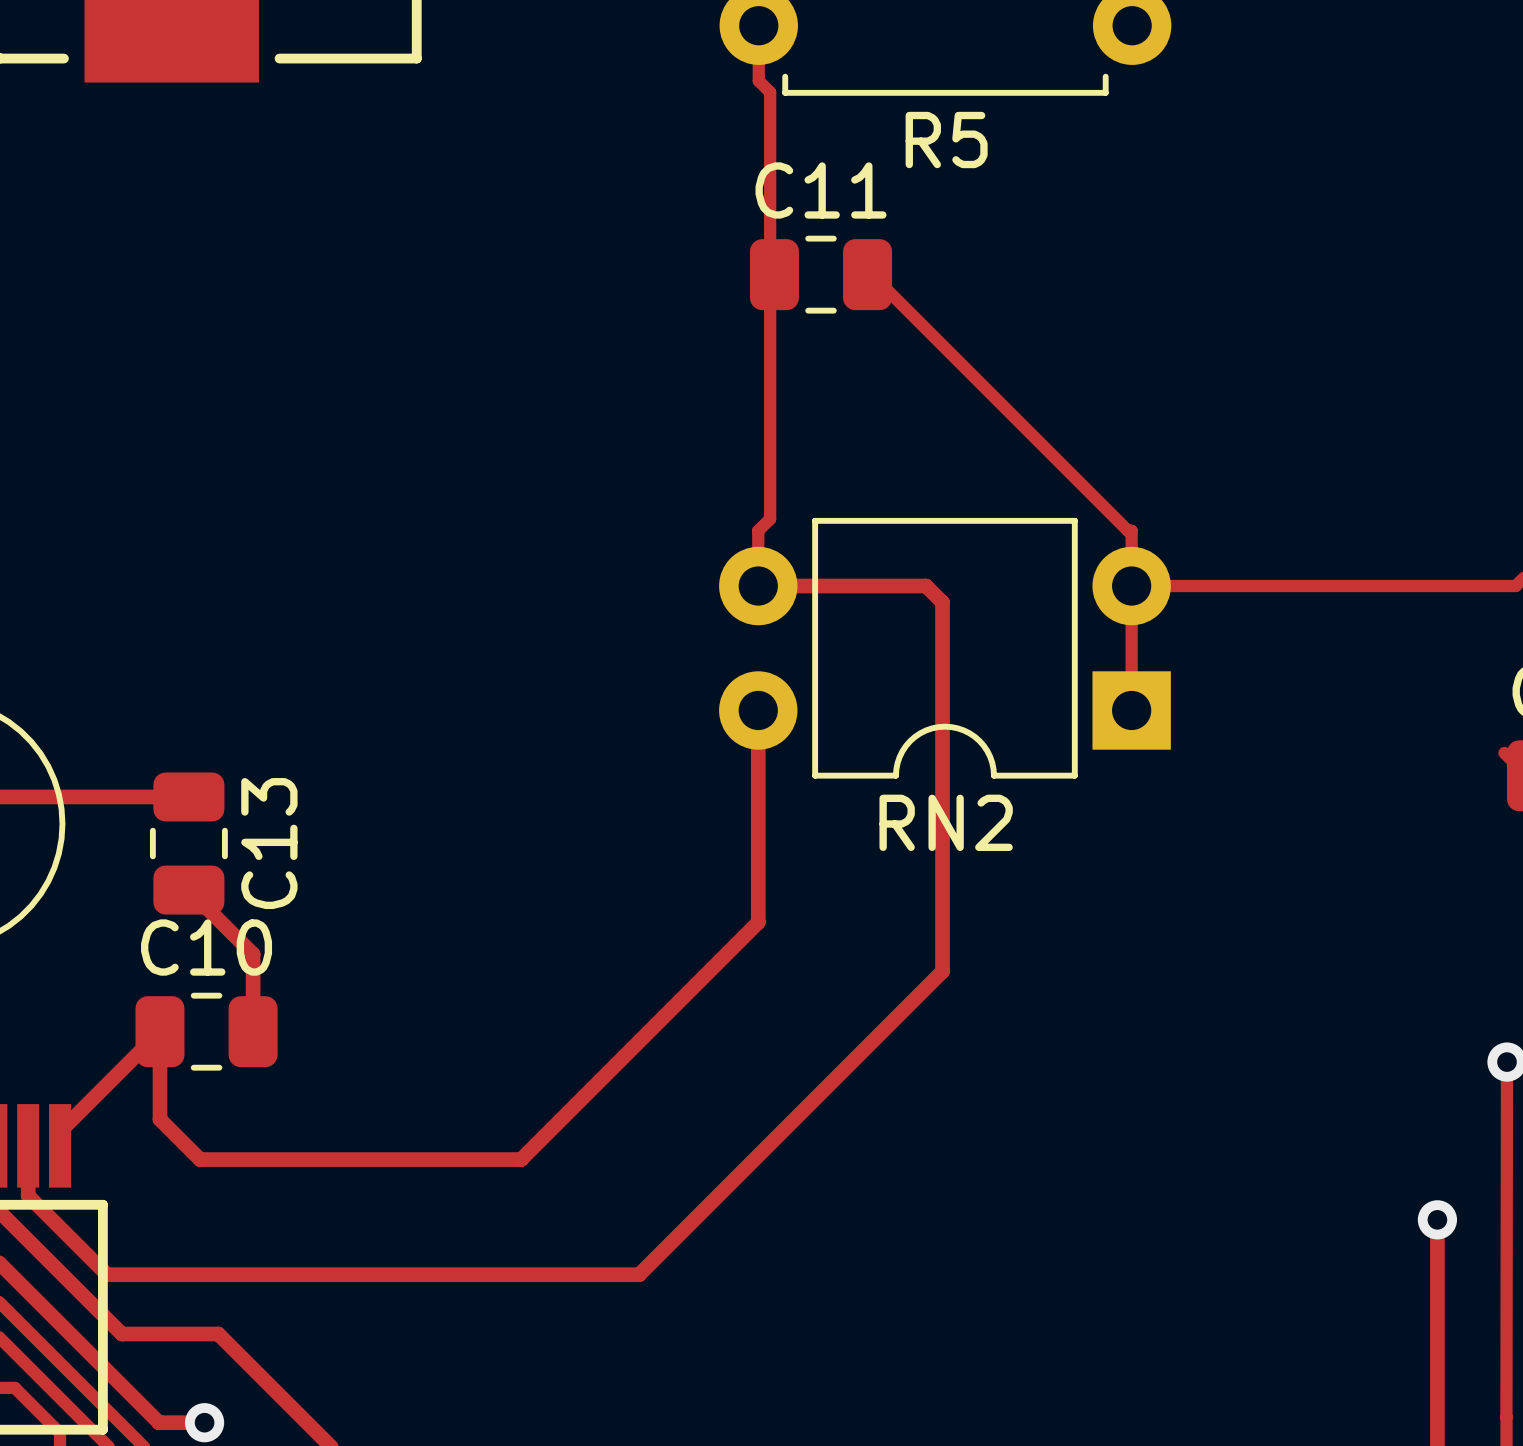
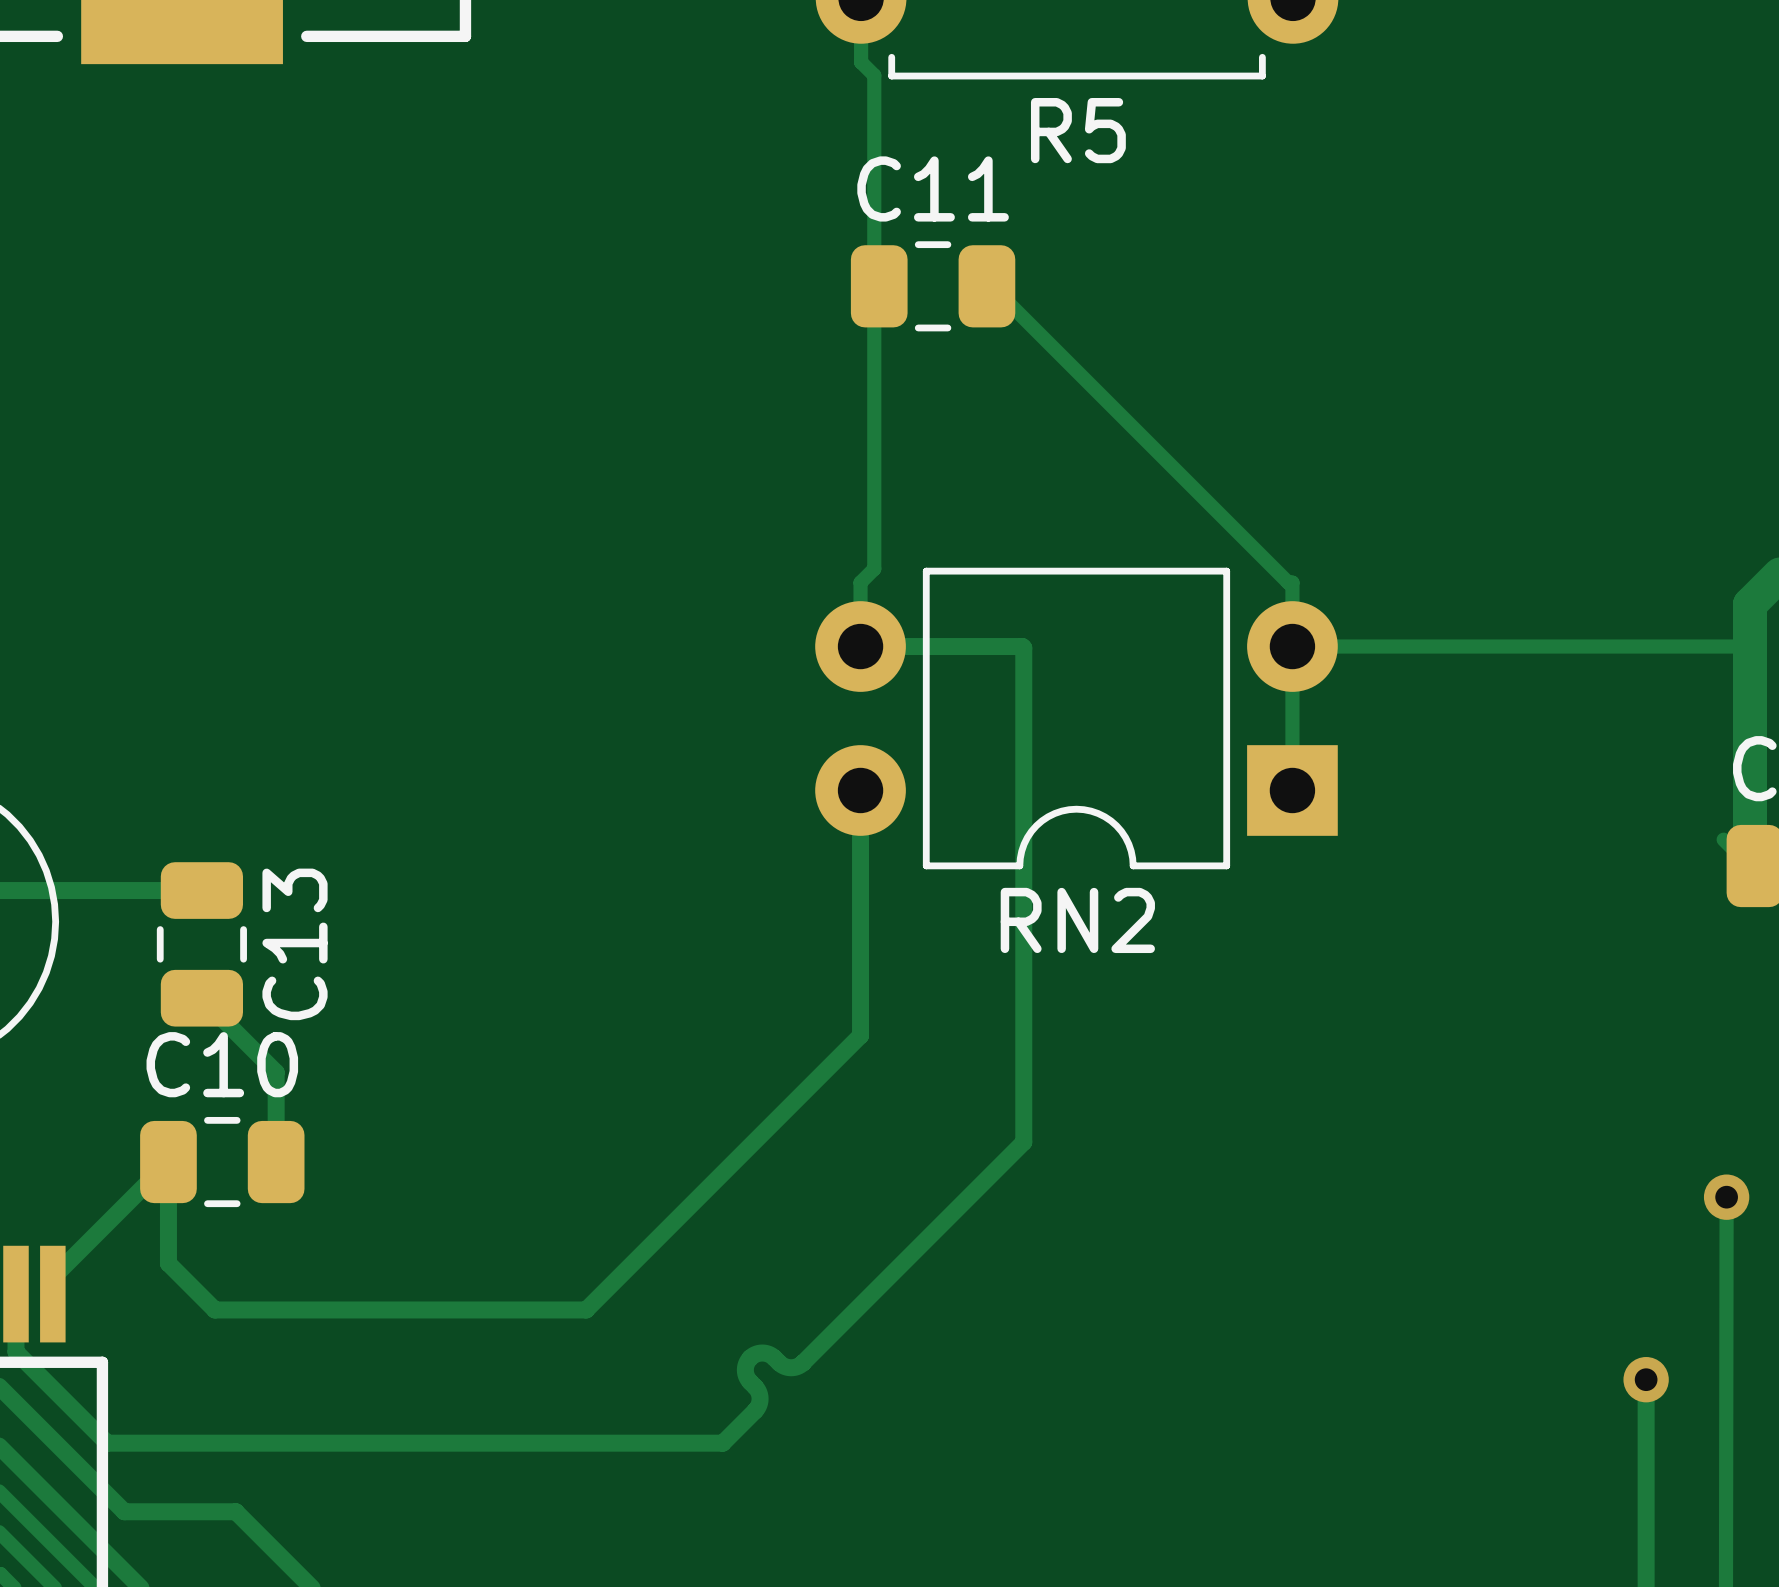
track: (898, 586) (926, 586) (942, 602) (942, 971) (899, 1014) -> (1022, 646) (1023, 1142)
track: (708, 1205) (667, 1246) -> (803, 1362) (796, 1366) (789, 1367) (782, 1365) (766, 1353) (756, 1353) (750, 1357) (746, 1364) (745, 1371) (747, 1379) (759, 1395) (759, 1404) (755, 1410)

